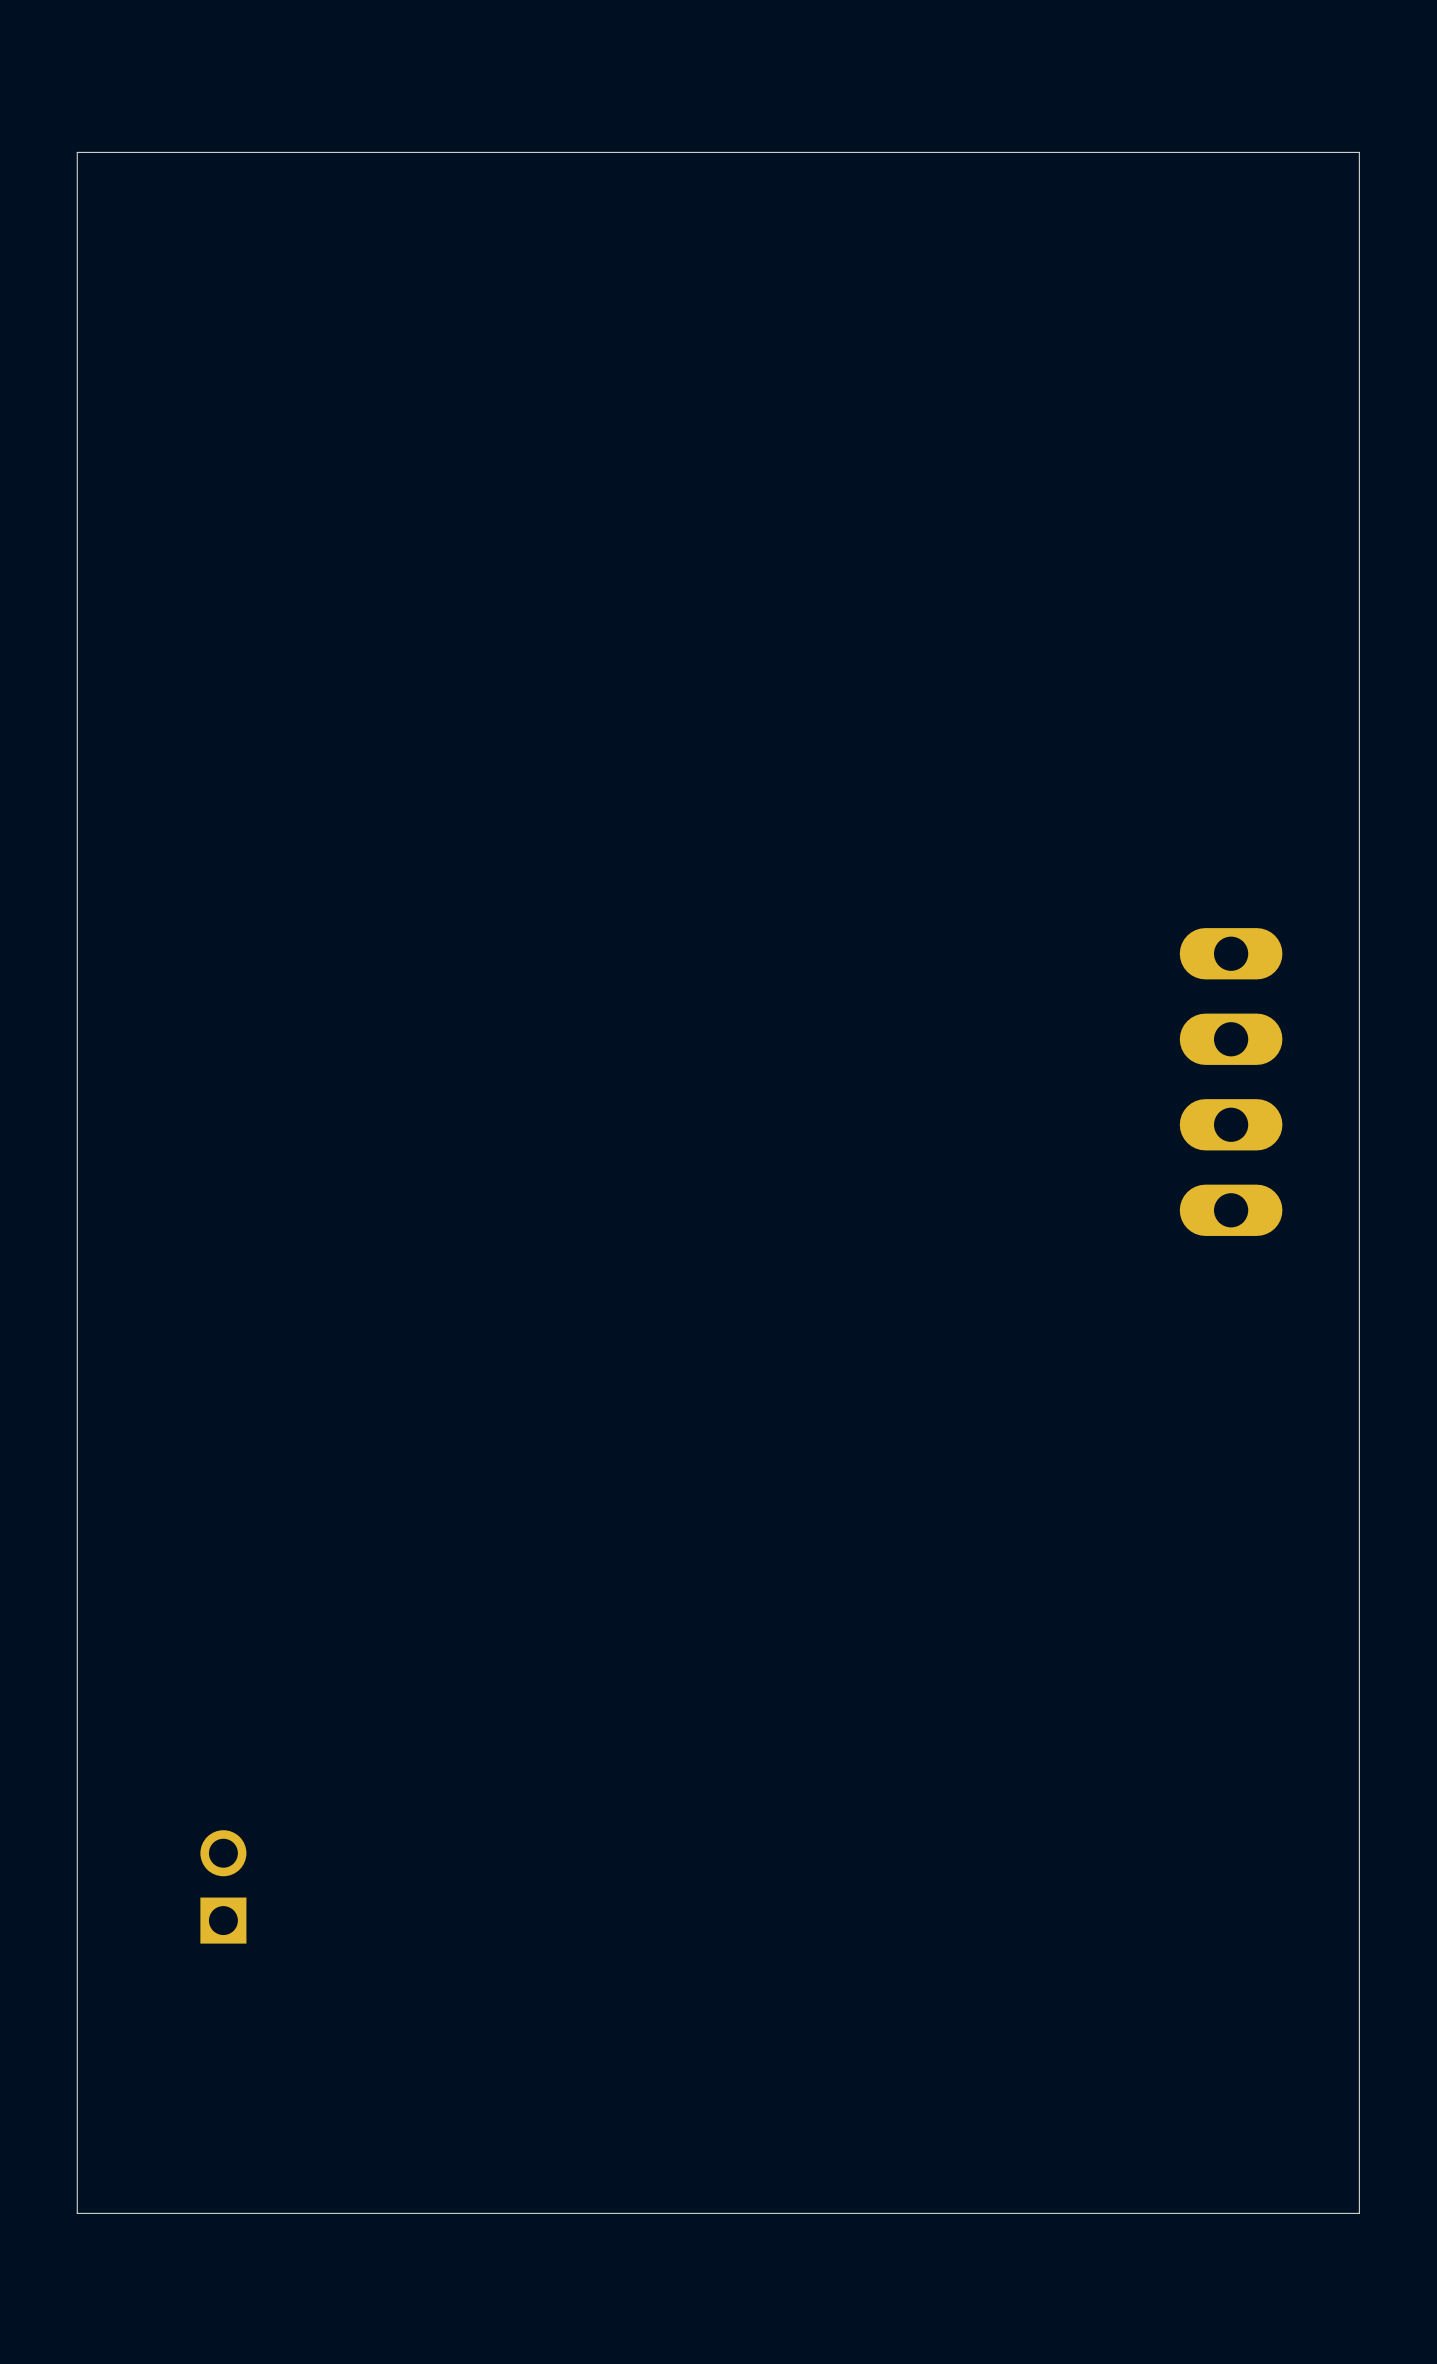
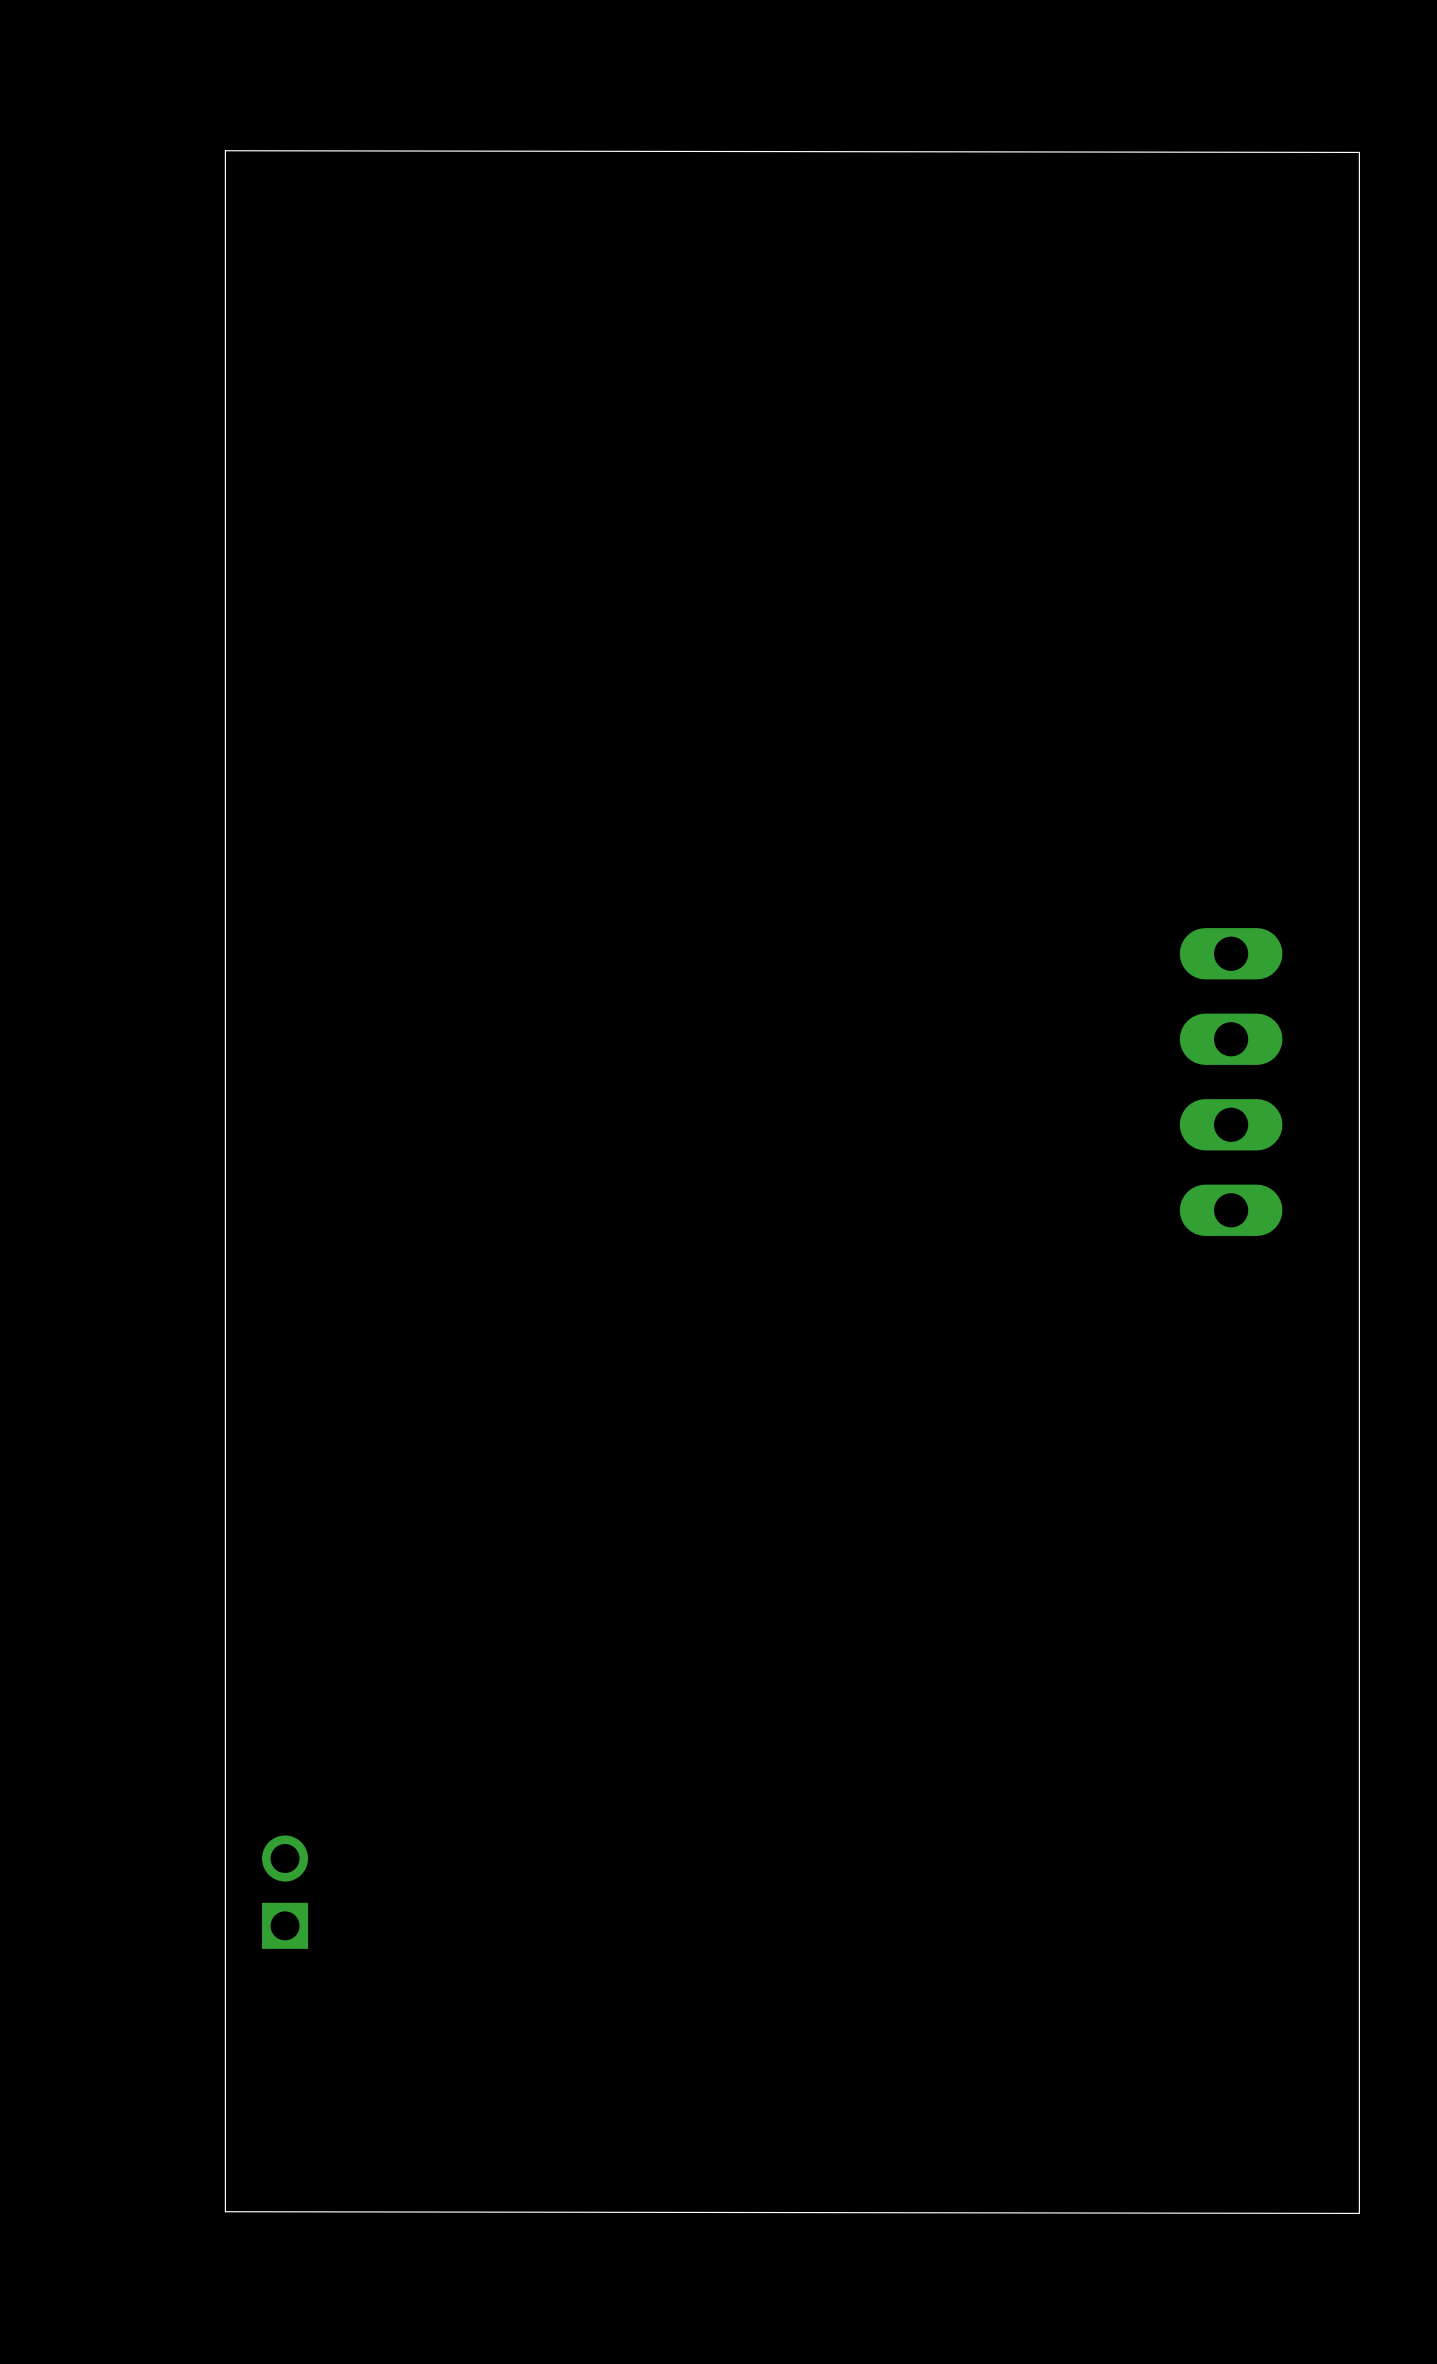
board edge: (1359, 152) (77, 152) (77, 2213) (1359, 2213) -> (1359, 152) (225, 150) (225, 2211) (1359, 2213)
part position: (223, 1886) -> (285, 1892)

